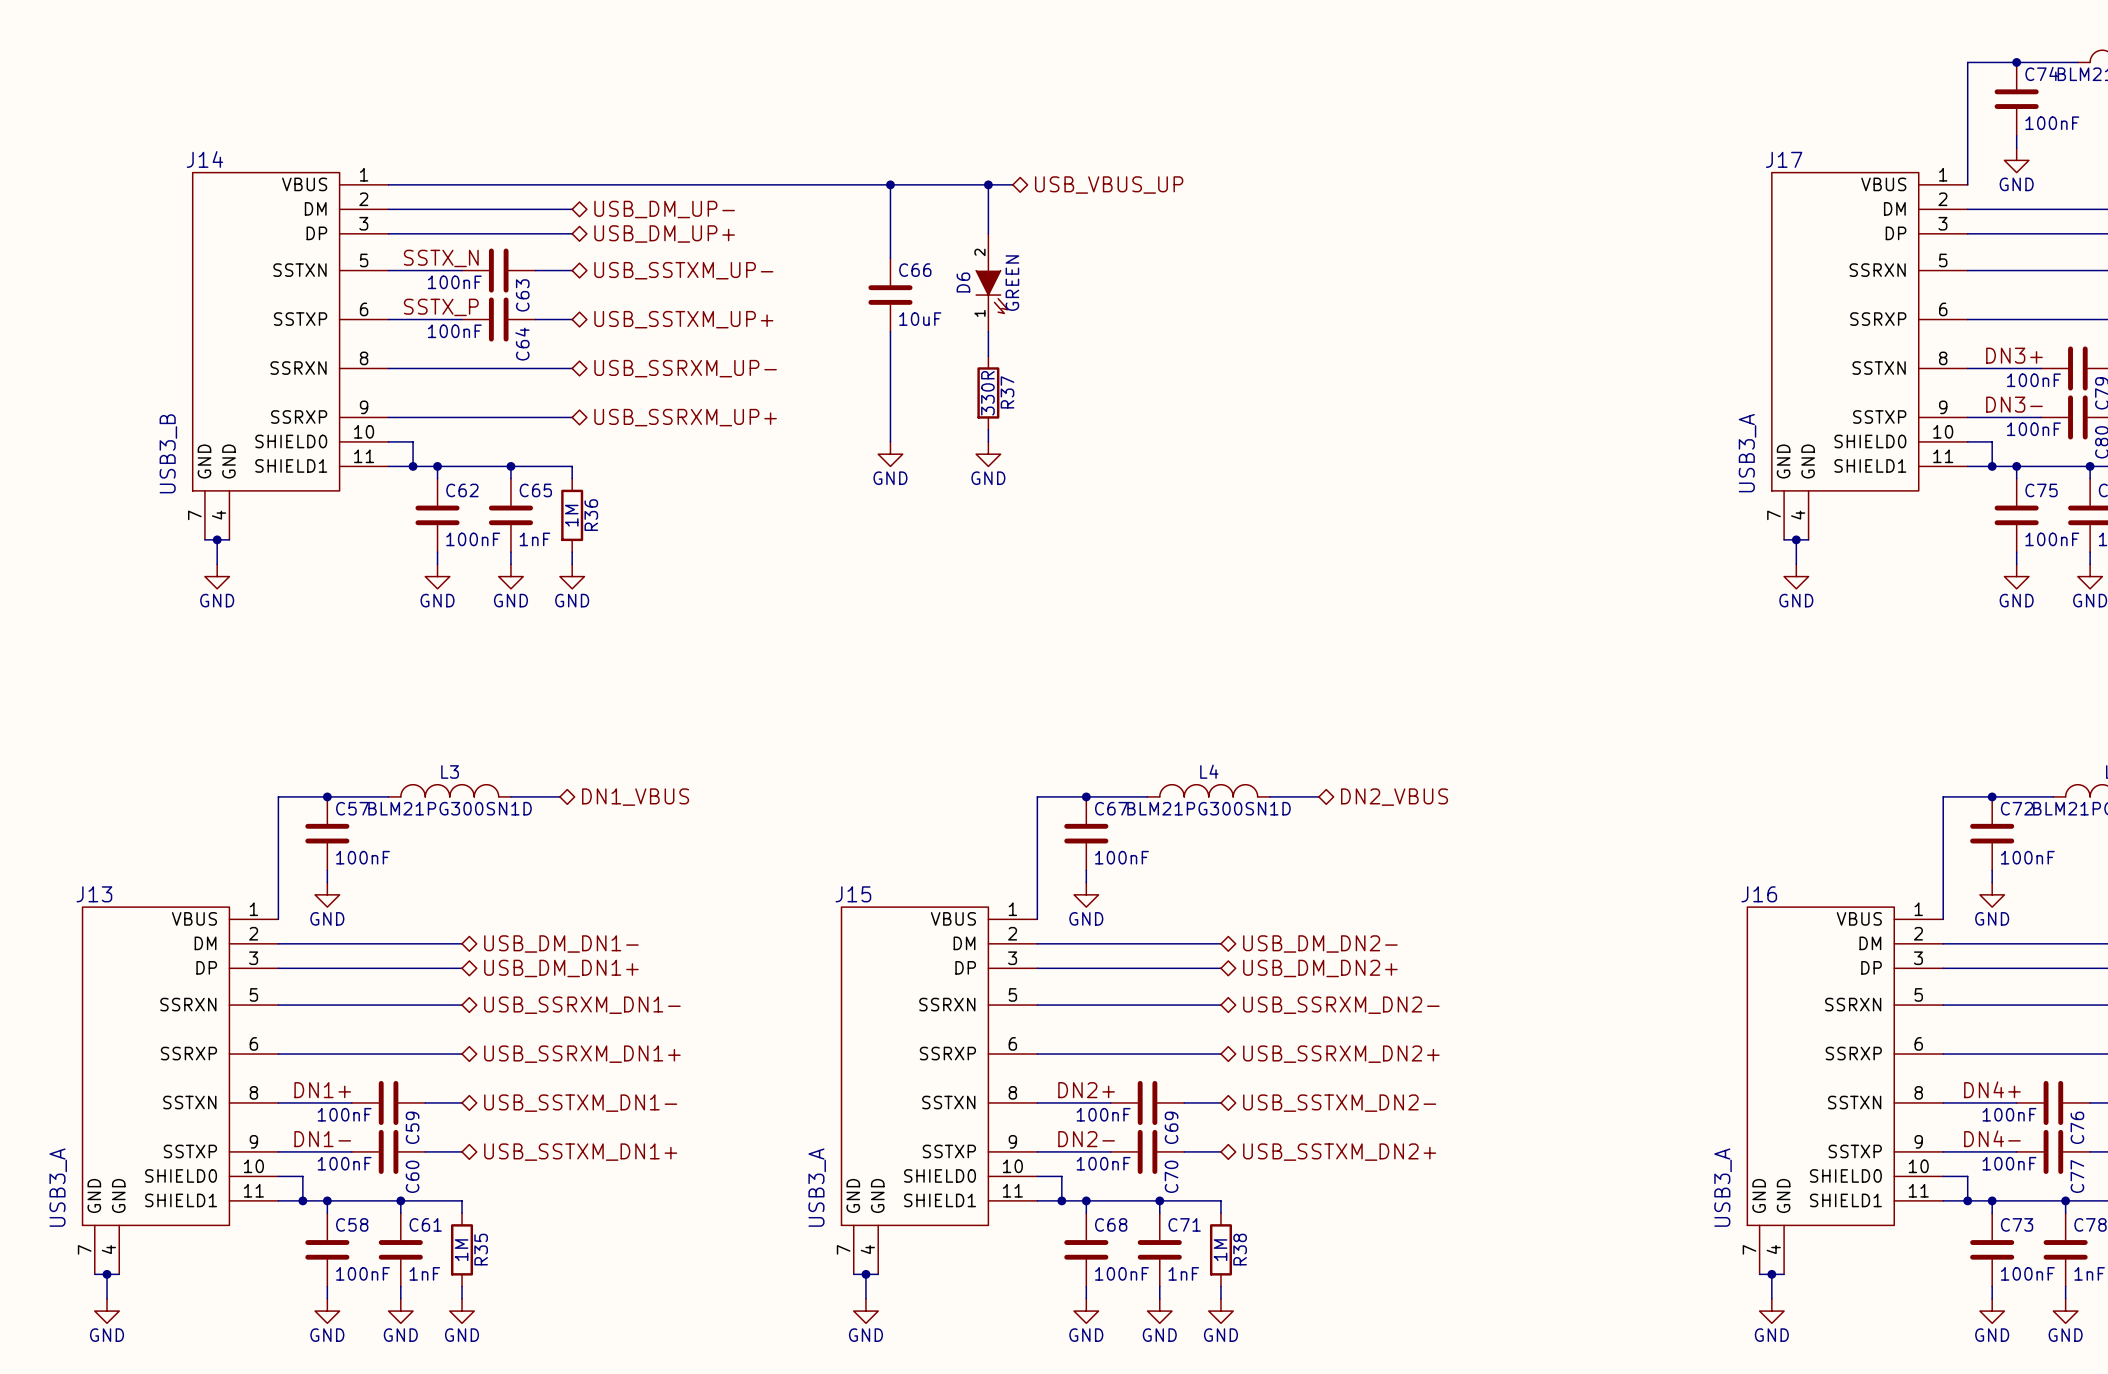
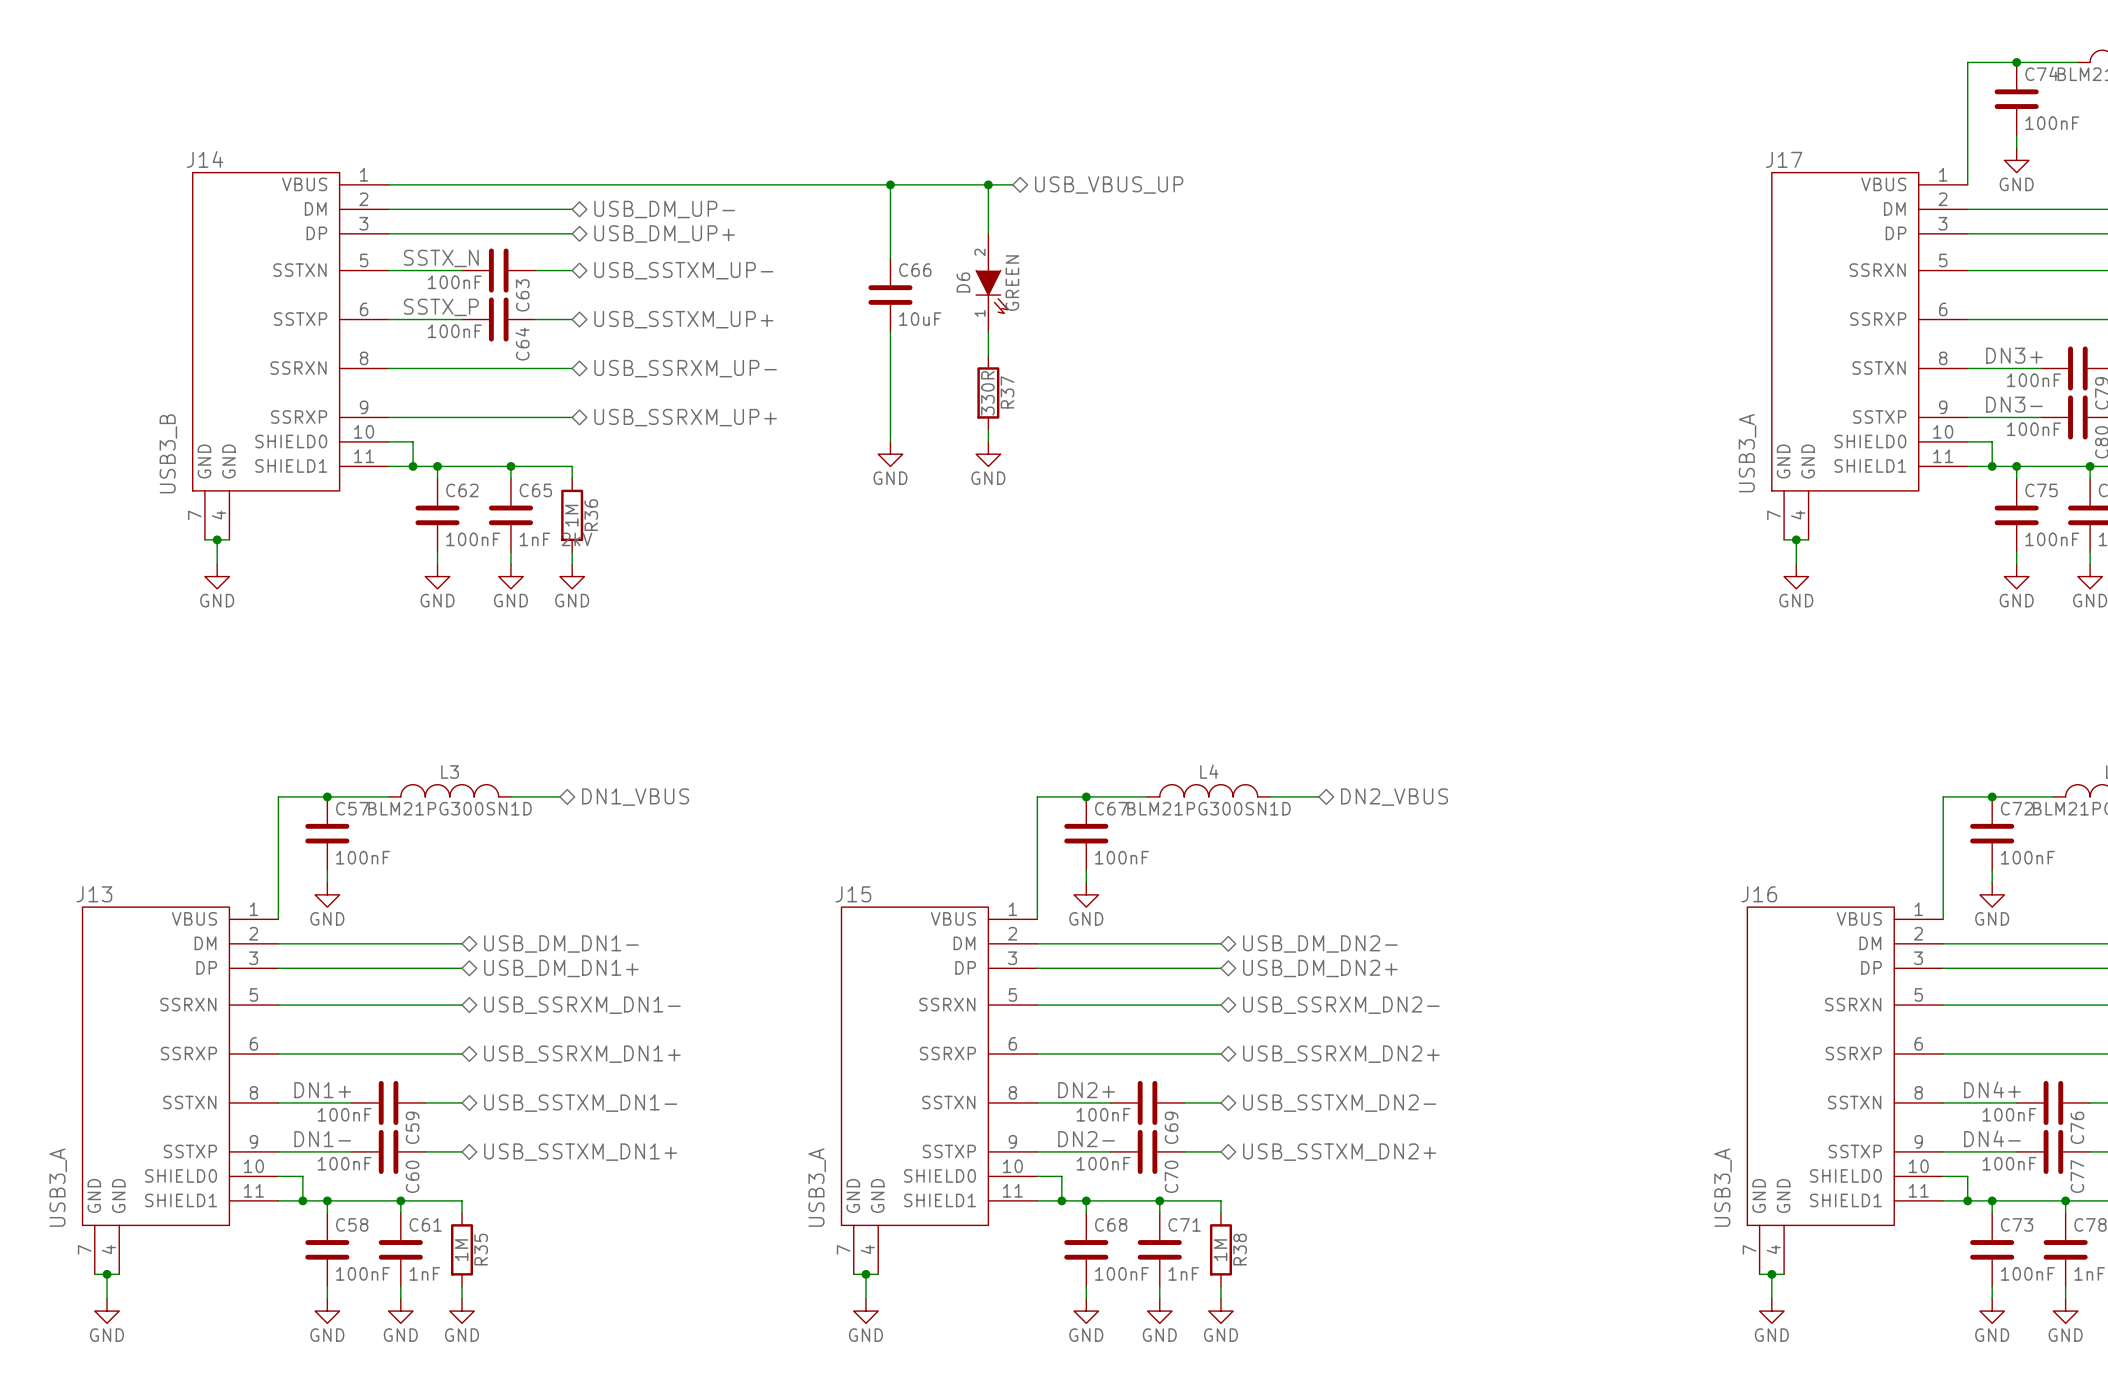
C65 value: 1nF (534, 539) -> 1nF 2kV (555, 539)

